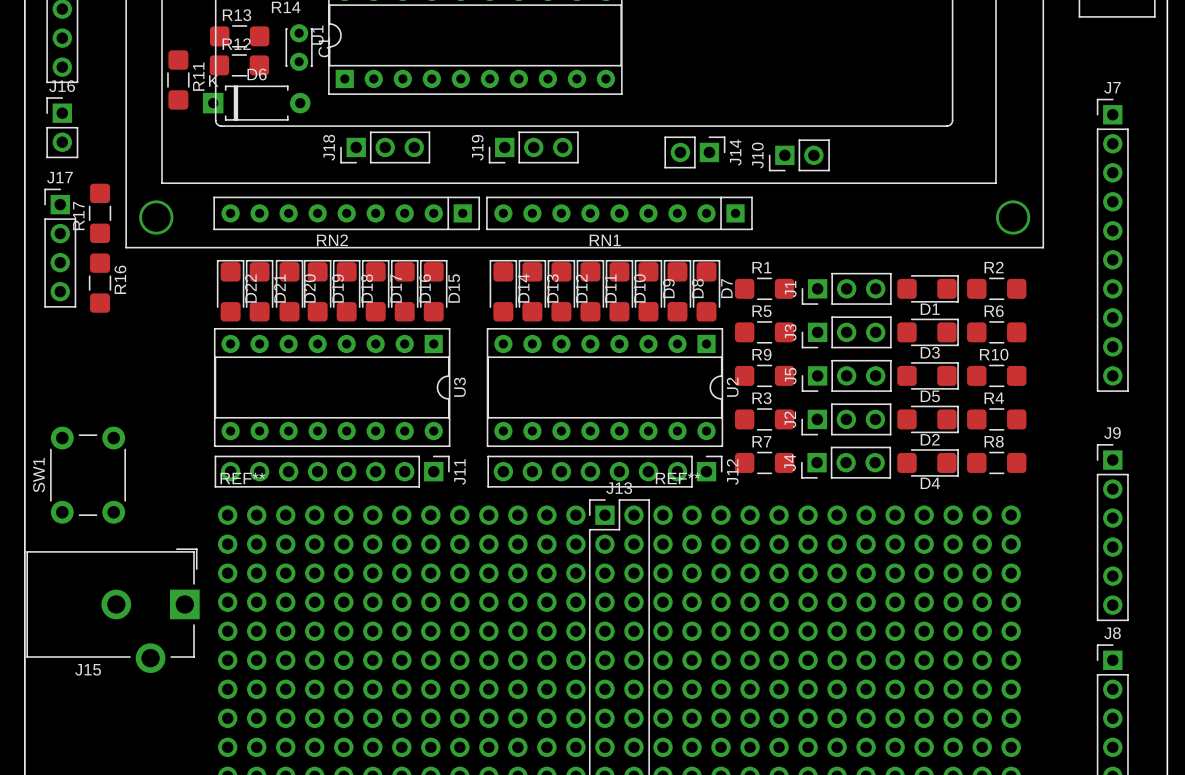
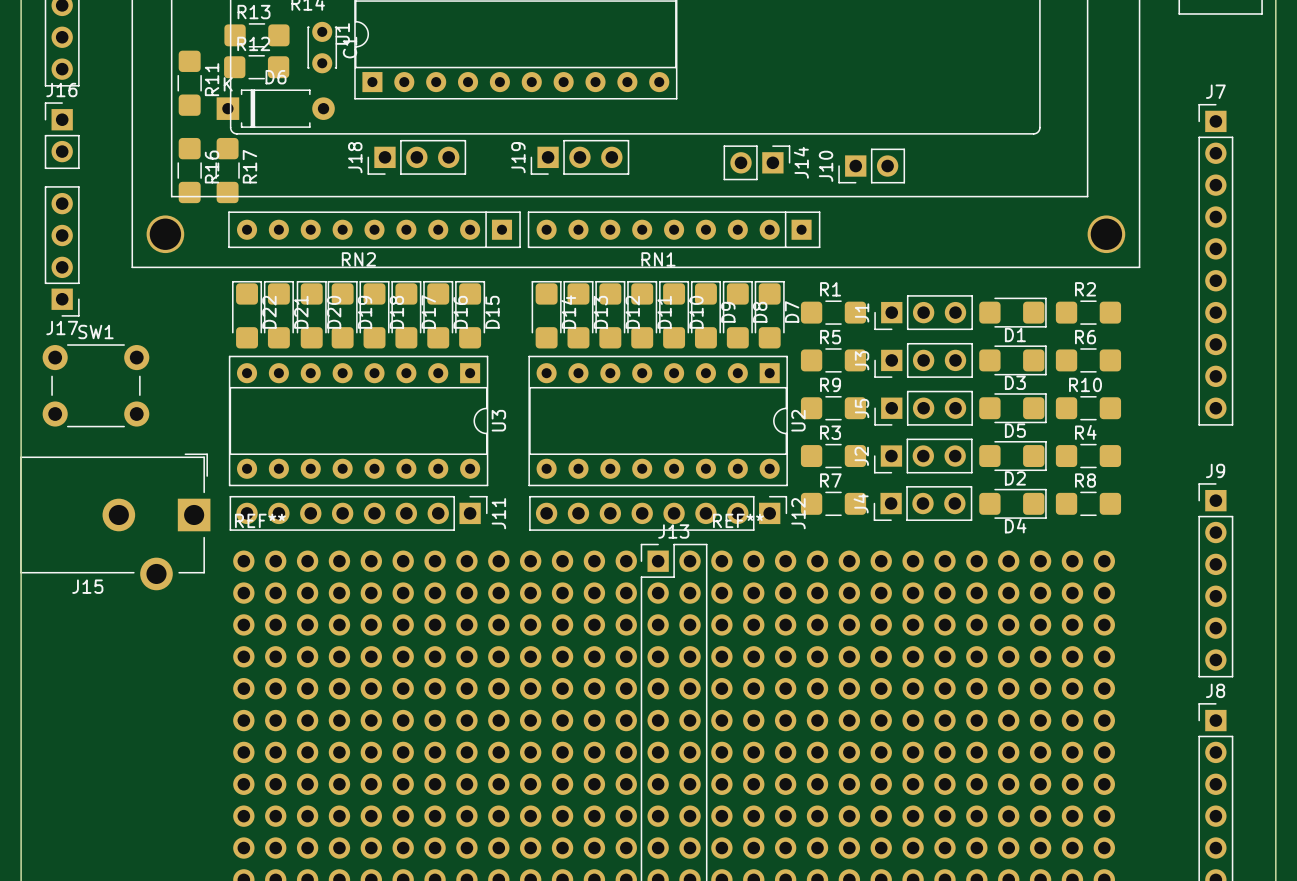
R17 position: (100, 213) -> (227, 170)
R17 name position: R17 (78, 216) -> R17 (249, 166)
J17 rotation: 0° (60, 248) -> 180° (62, 251)
R16 position: (100, 283) -> (189, 170)
SW1 rotation: 0° (88, 475) -> 90° clockwise (95, 385)
SW1 position: (88, 475) -> (95, 385)
J15 position: (113, 610) -> (115, 521)

